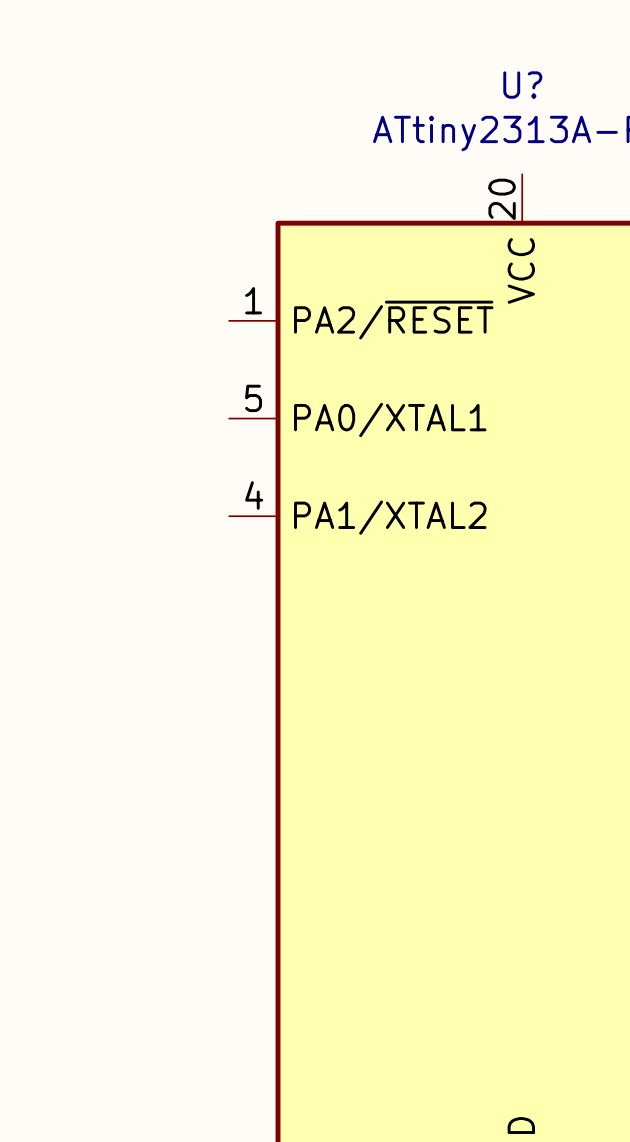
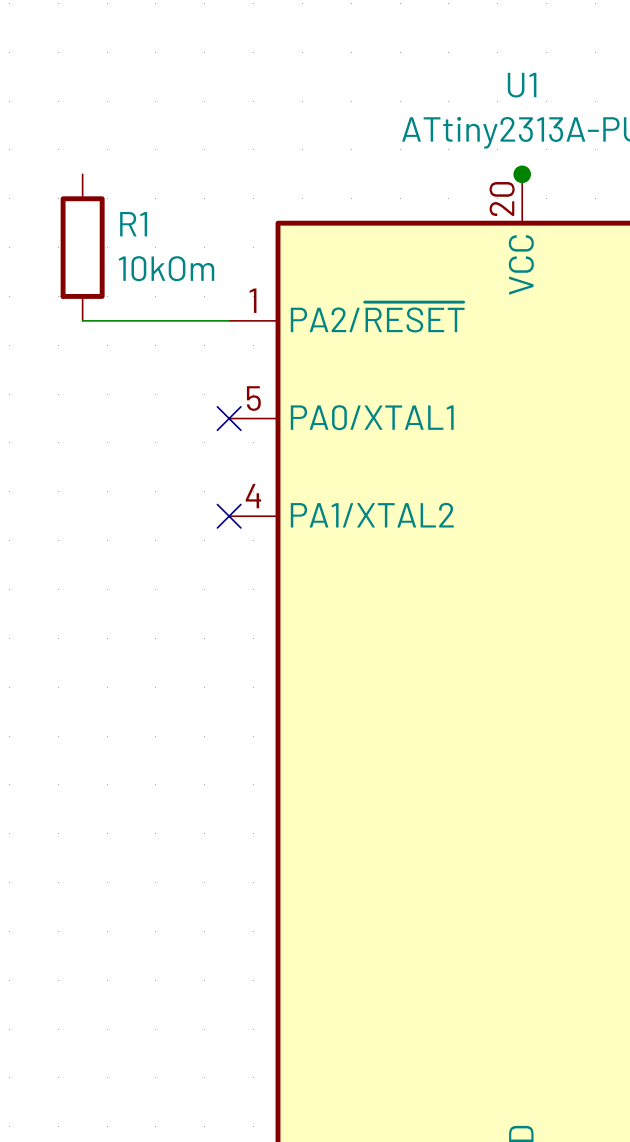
U? name: U? (522, 85) -> U1 (522, 85)
junction: none -> (522, 174)
R1: none -> 10kOm (82, 247)
wire: none -> (82, 320) (229, 320)
no-connect mark: none -> (229, 418)
no-connect mark: none -> (229, 516)

